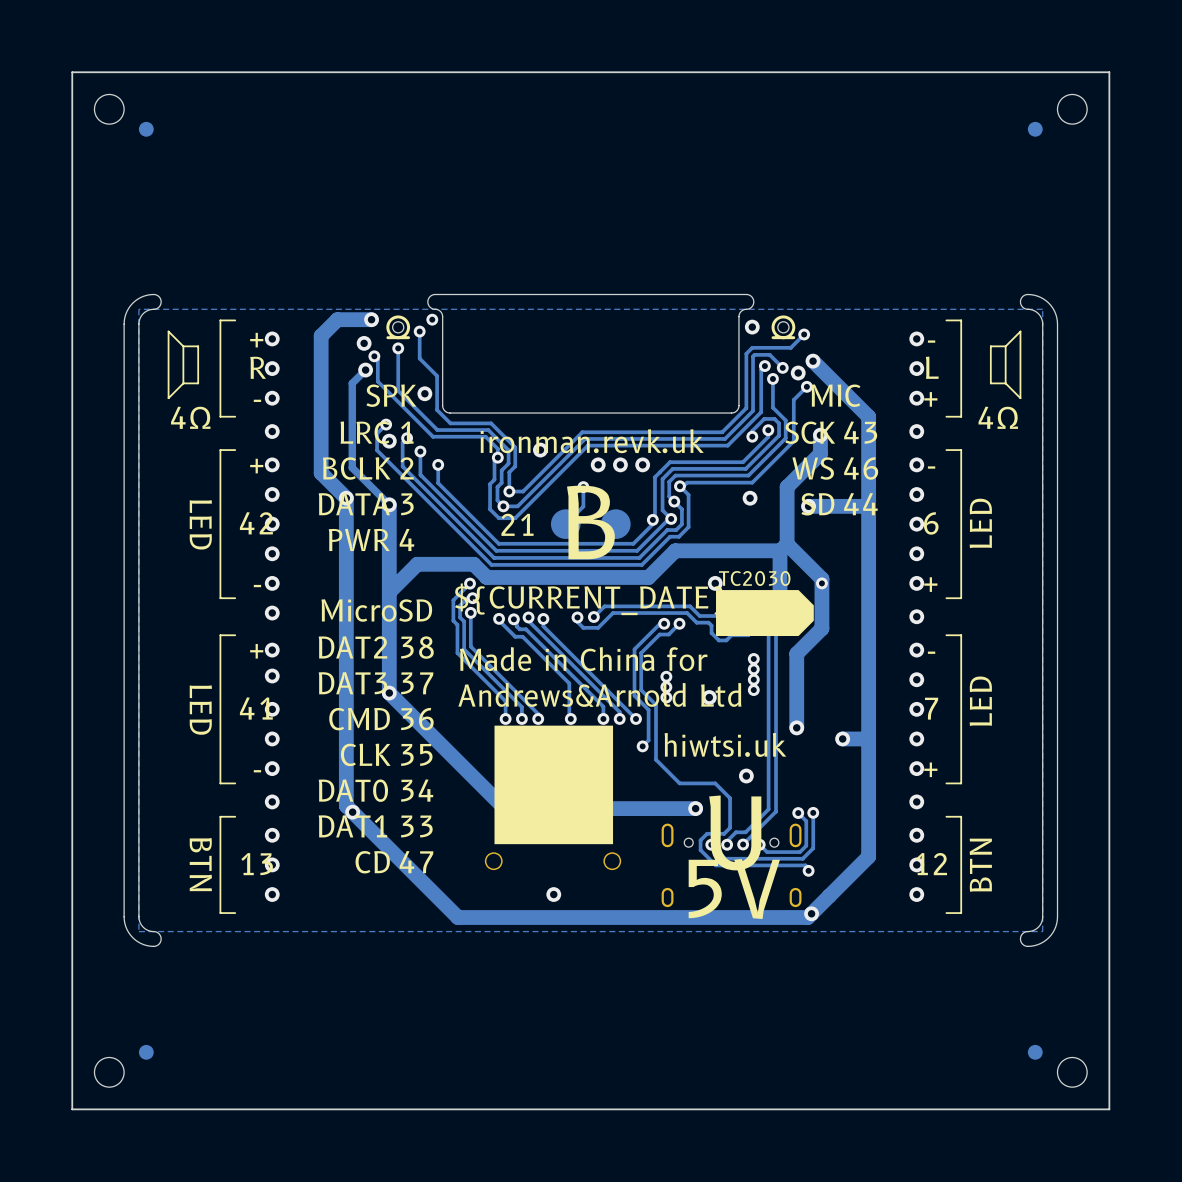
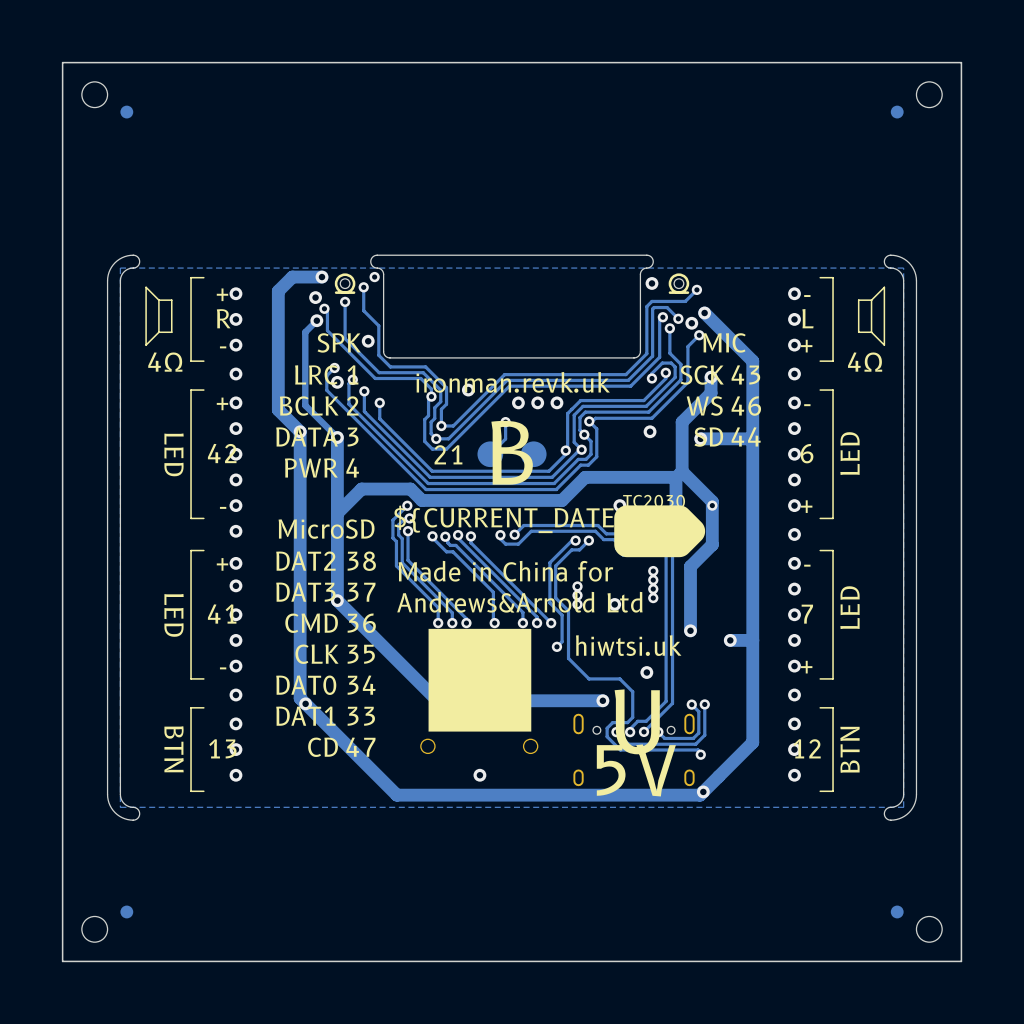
part footprint: [716, 590, 814, 637] -> [614, 505, 706, 558]

